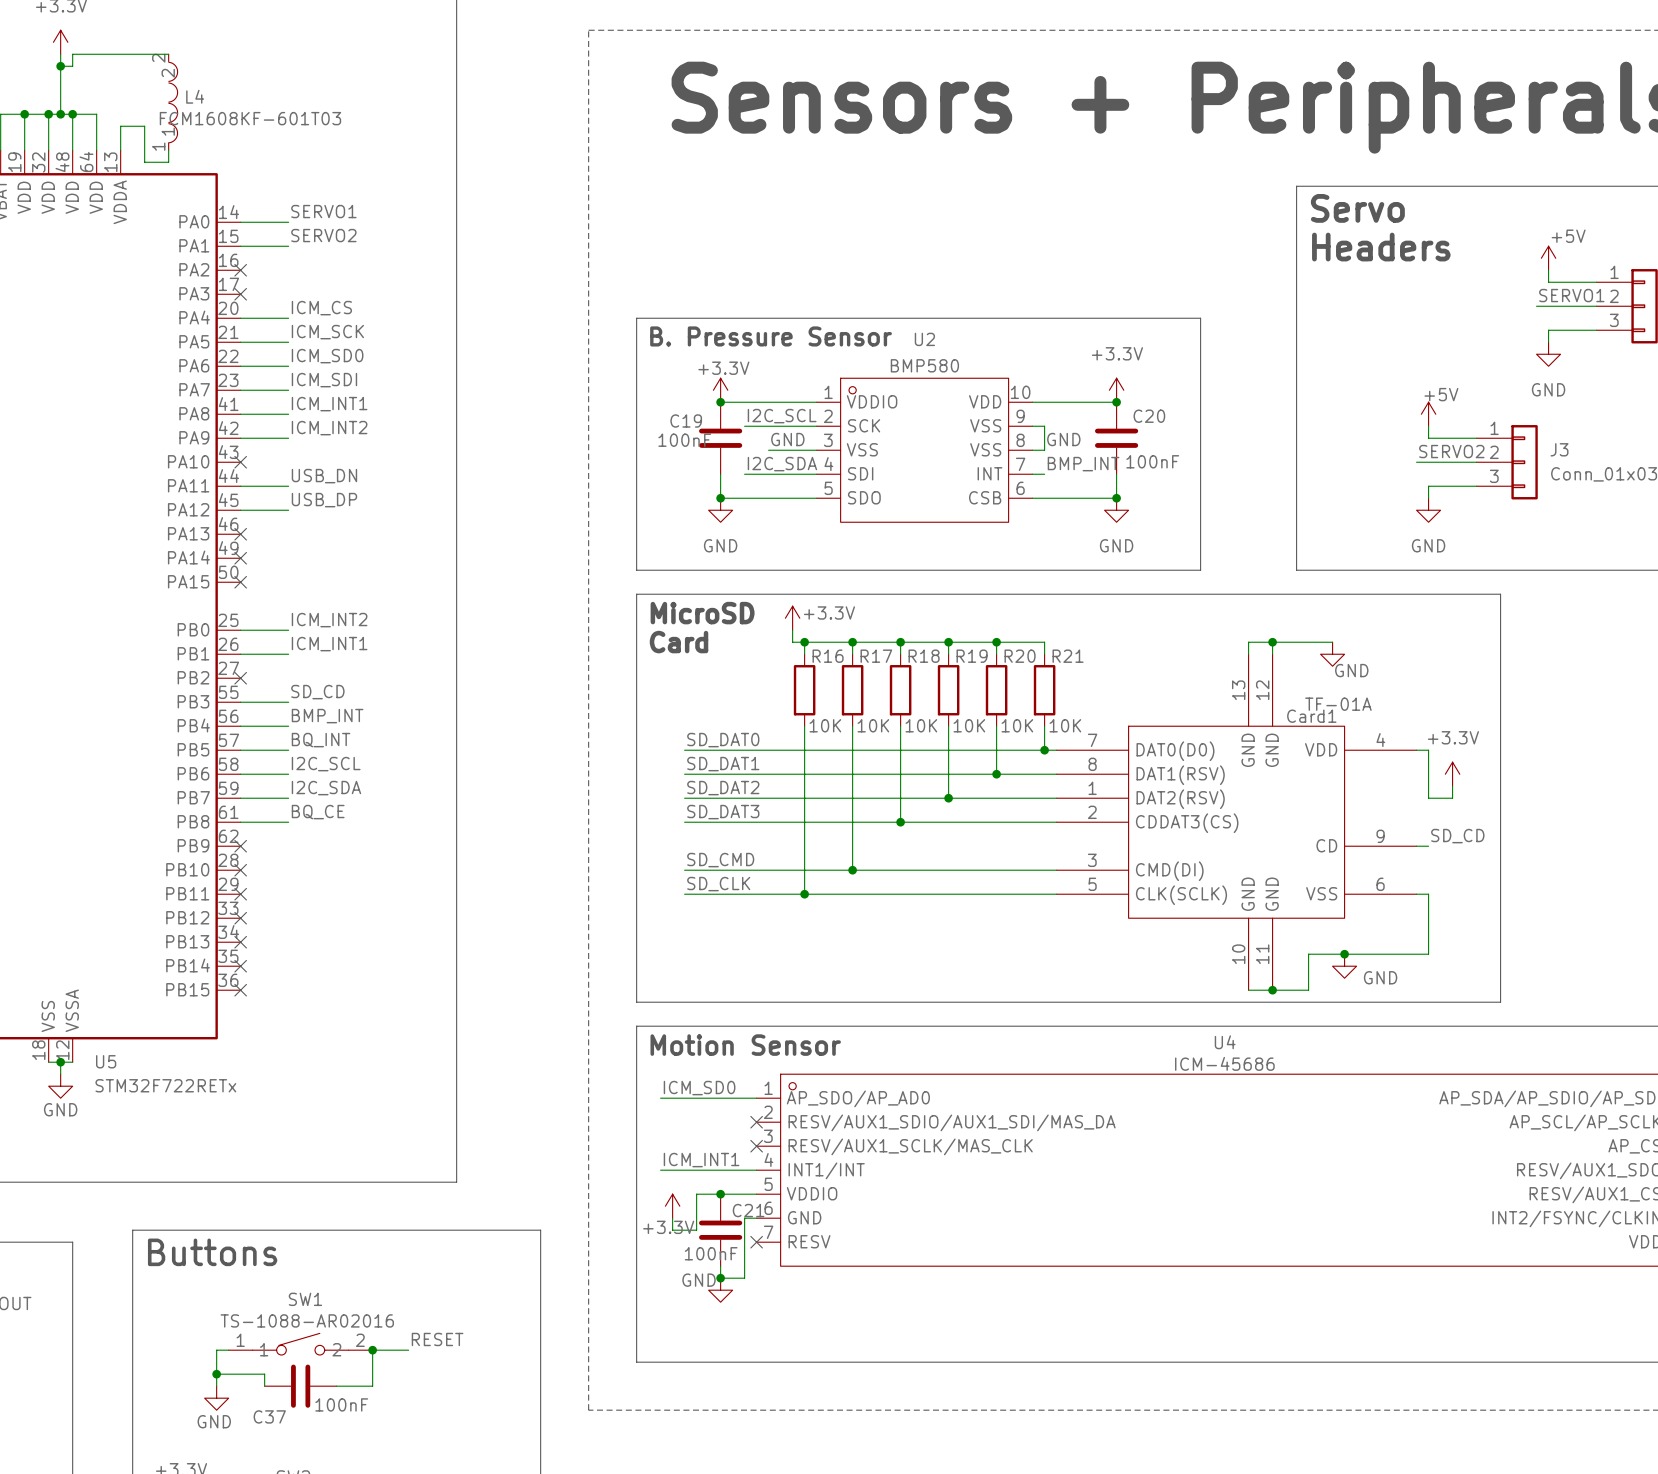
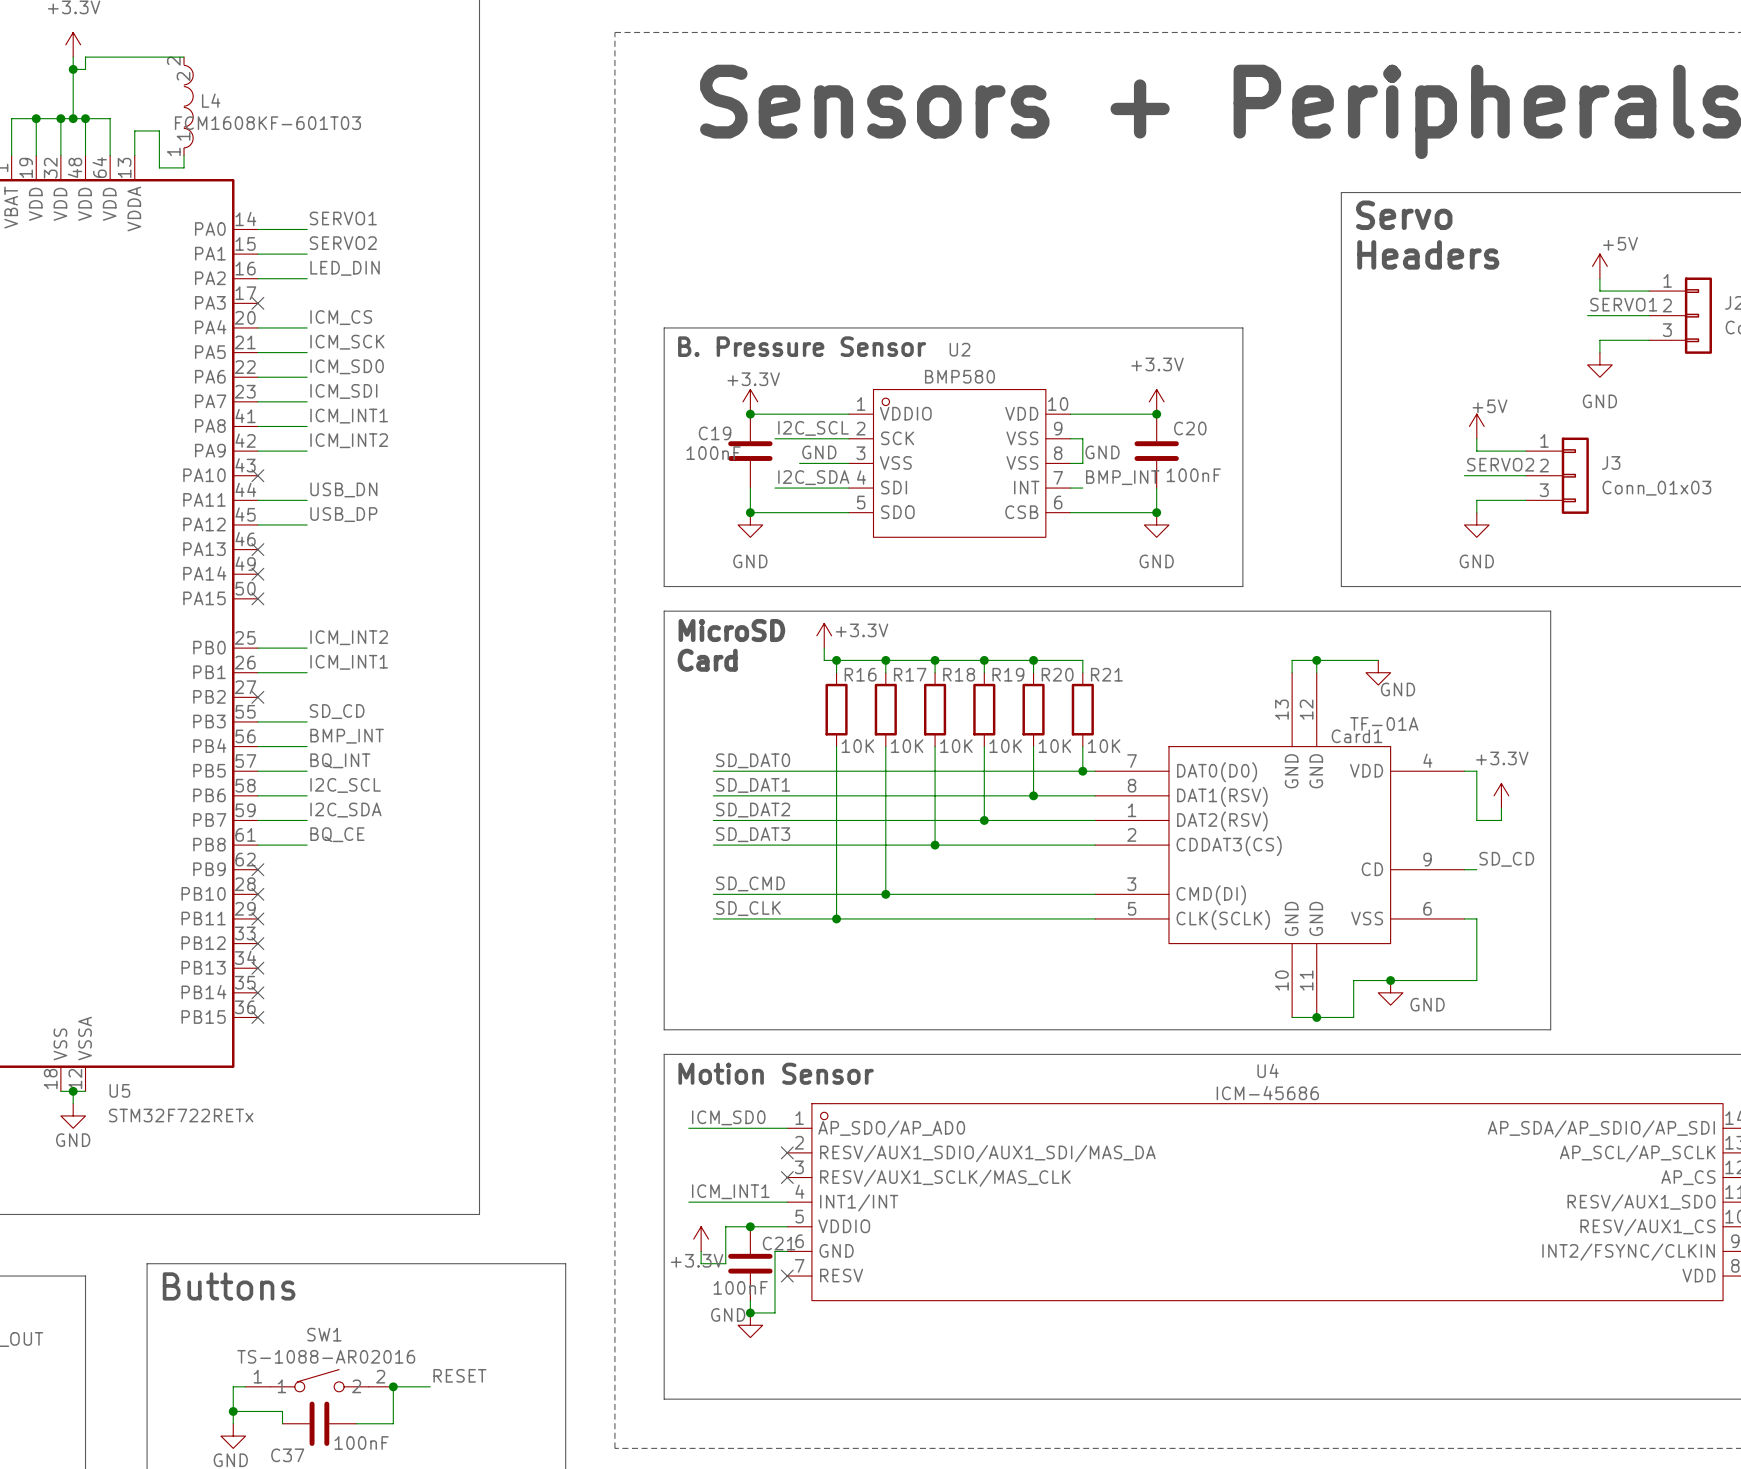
label: none -> LED_DIN (345, 268)
wire: none -> (257, 278) (307, 278)
no-connect mark: (240, 270) -> none

